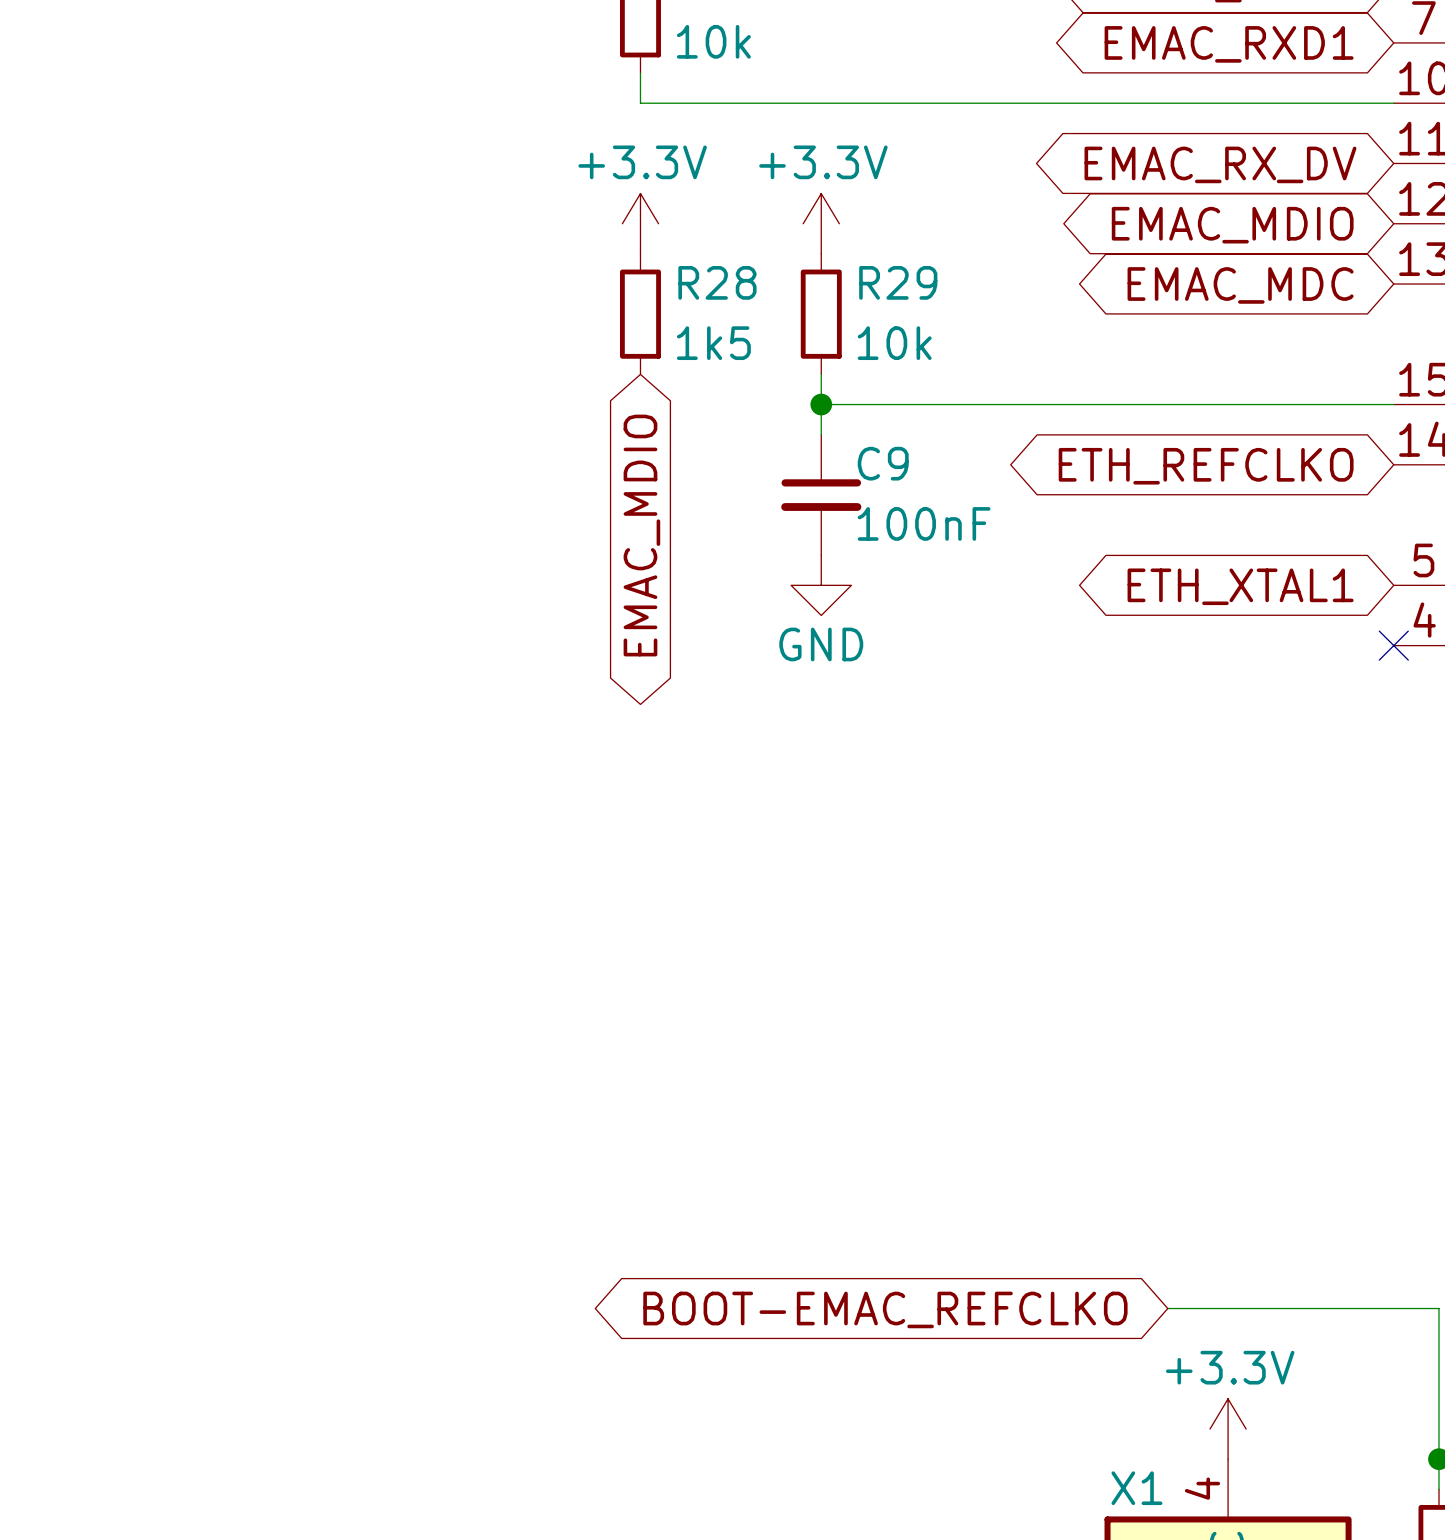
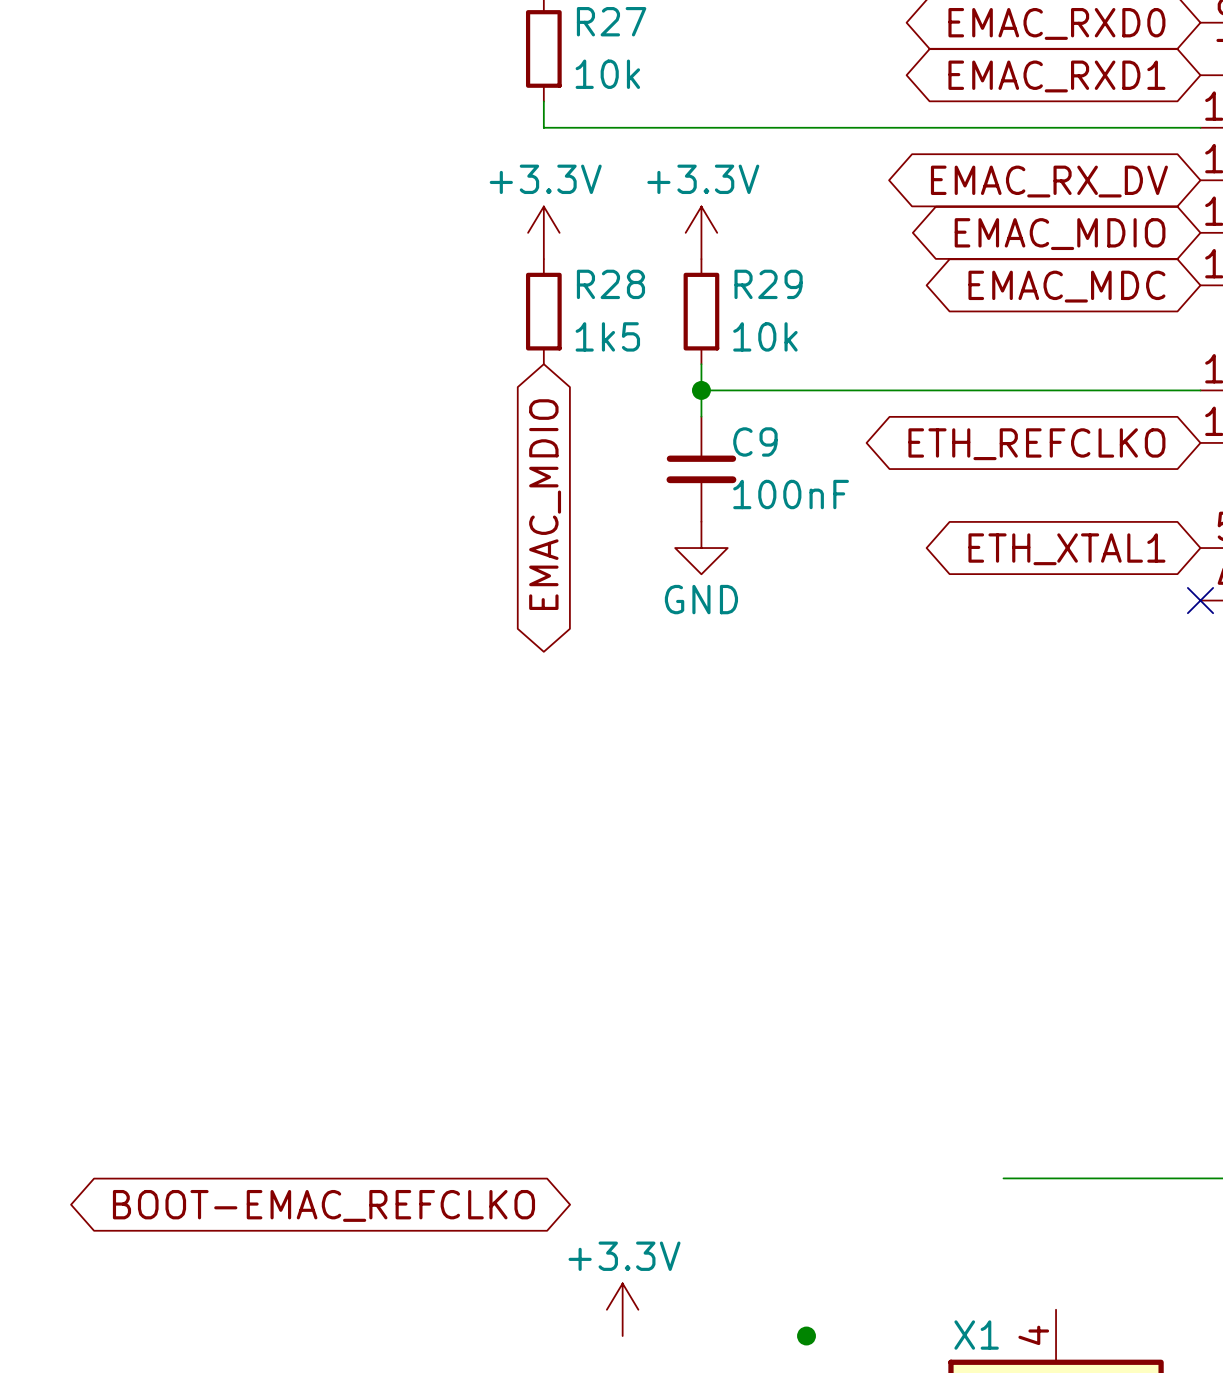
global label position: BOOT-EMAC_REFCLKO (885, 1309) -> BOOT-EMAC_REFCLKO (323, 1205)
power symbol position: +3.3V (1228, 1429) -> +3.3V (622, 1309)
junction: none -> (806, 1336)

